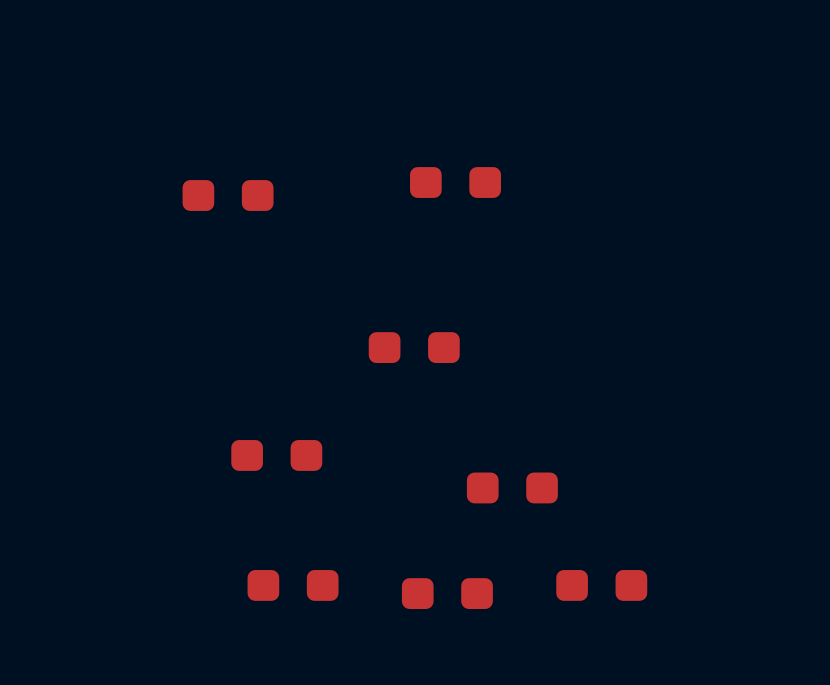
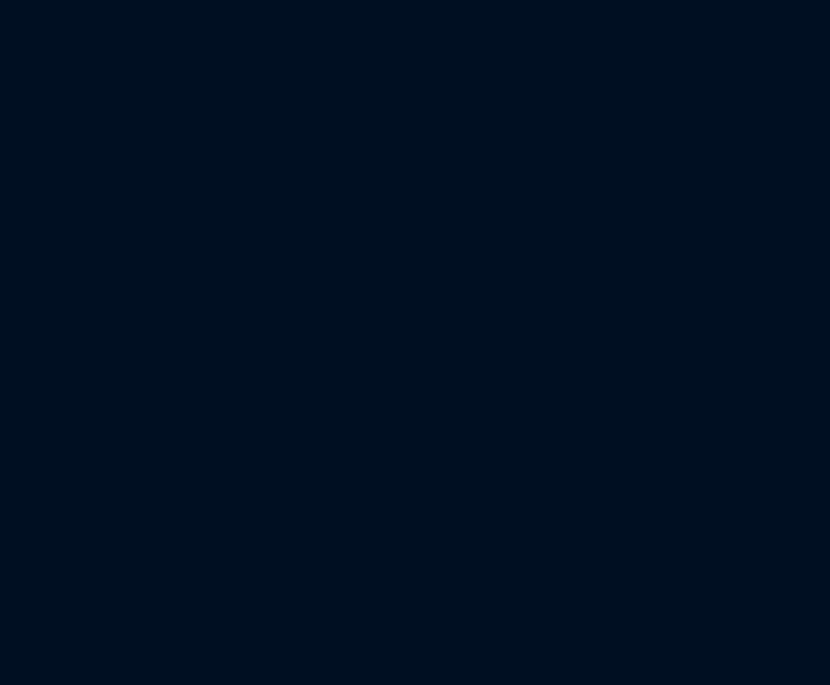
part: (455, 182) -> none
part: (228, 195) -> none
part: (414, 347) -> none
part: (276, 455) -> none
part: (512, 487) -> none
part: (293, 585) -> none
part: (601, 585) -> none
part: (447, 593) -> none

